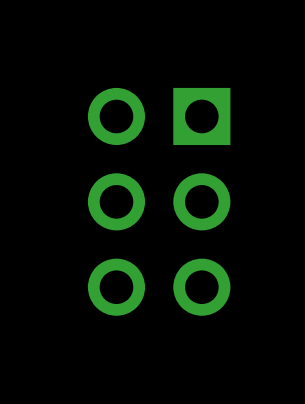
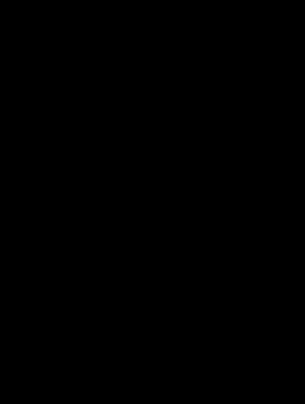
part: (159, 201) -> none

